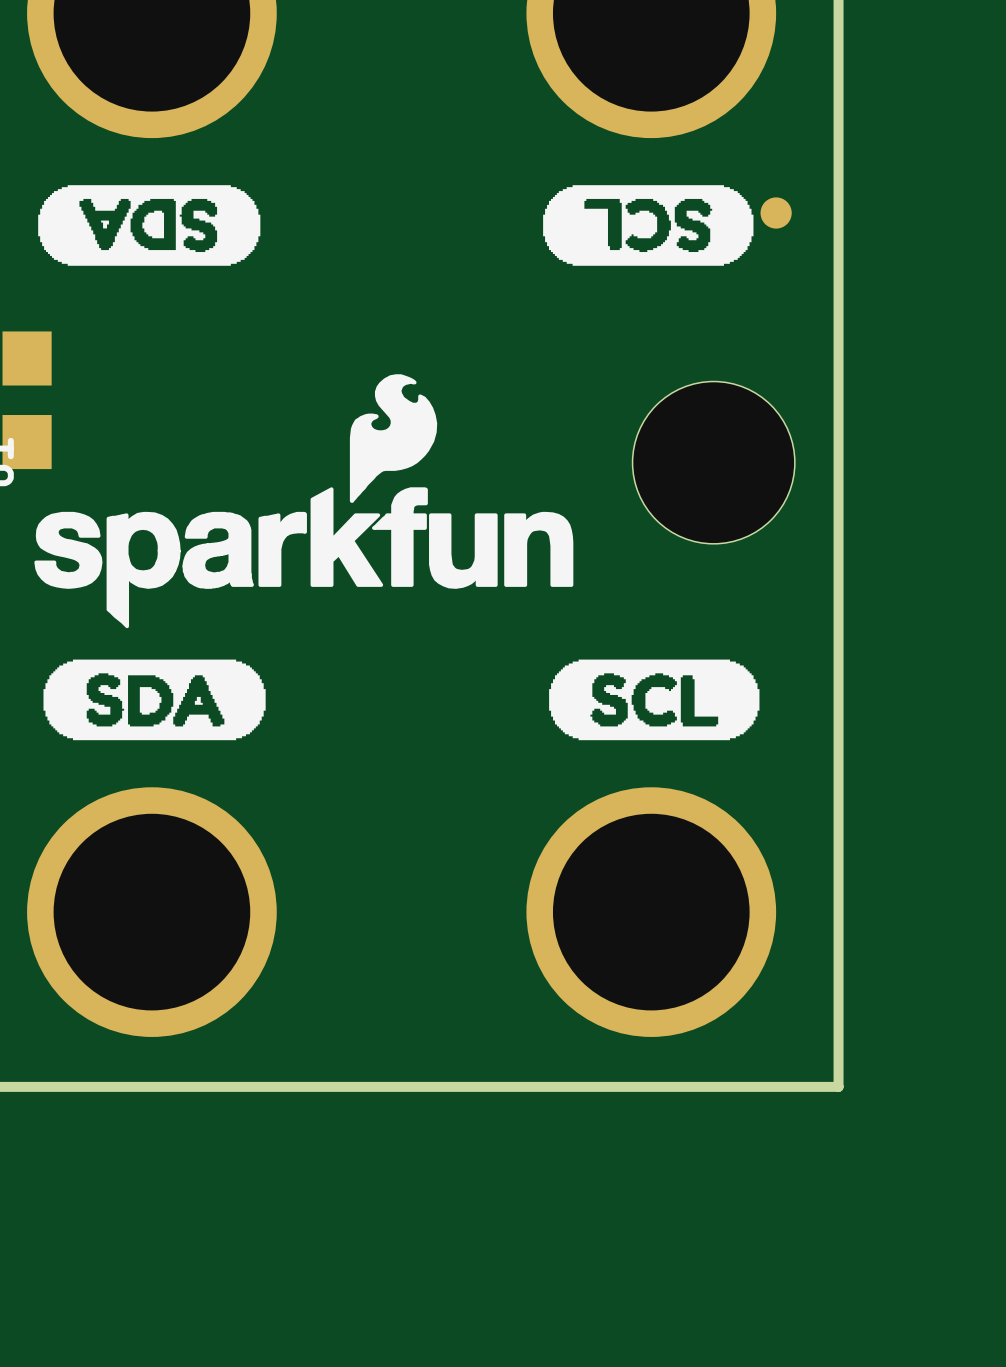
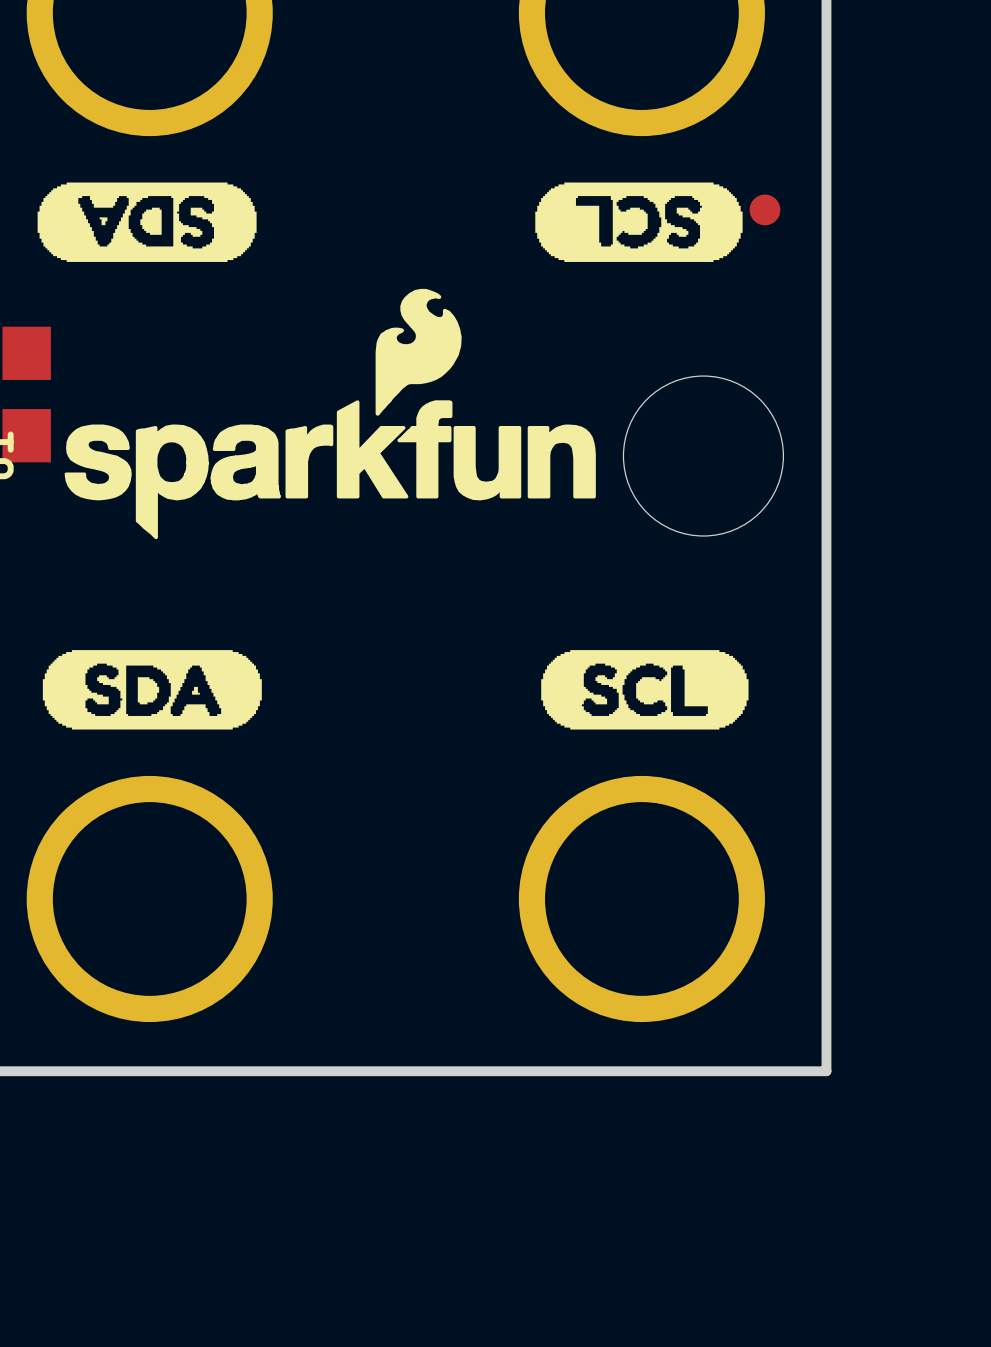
drawing position: (303, 501) -> (330, 414)

